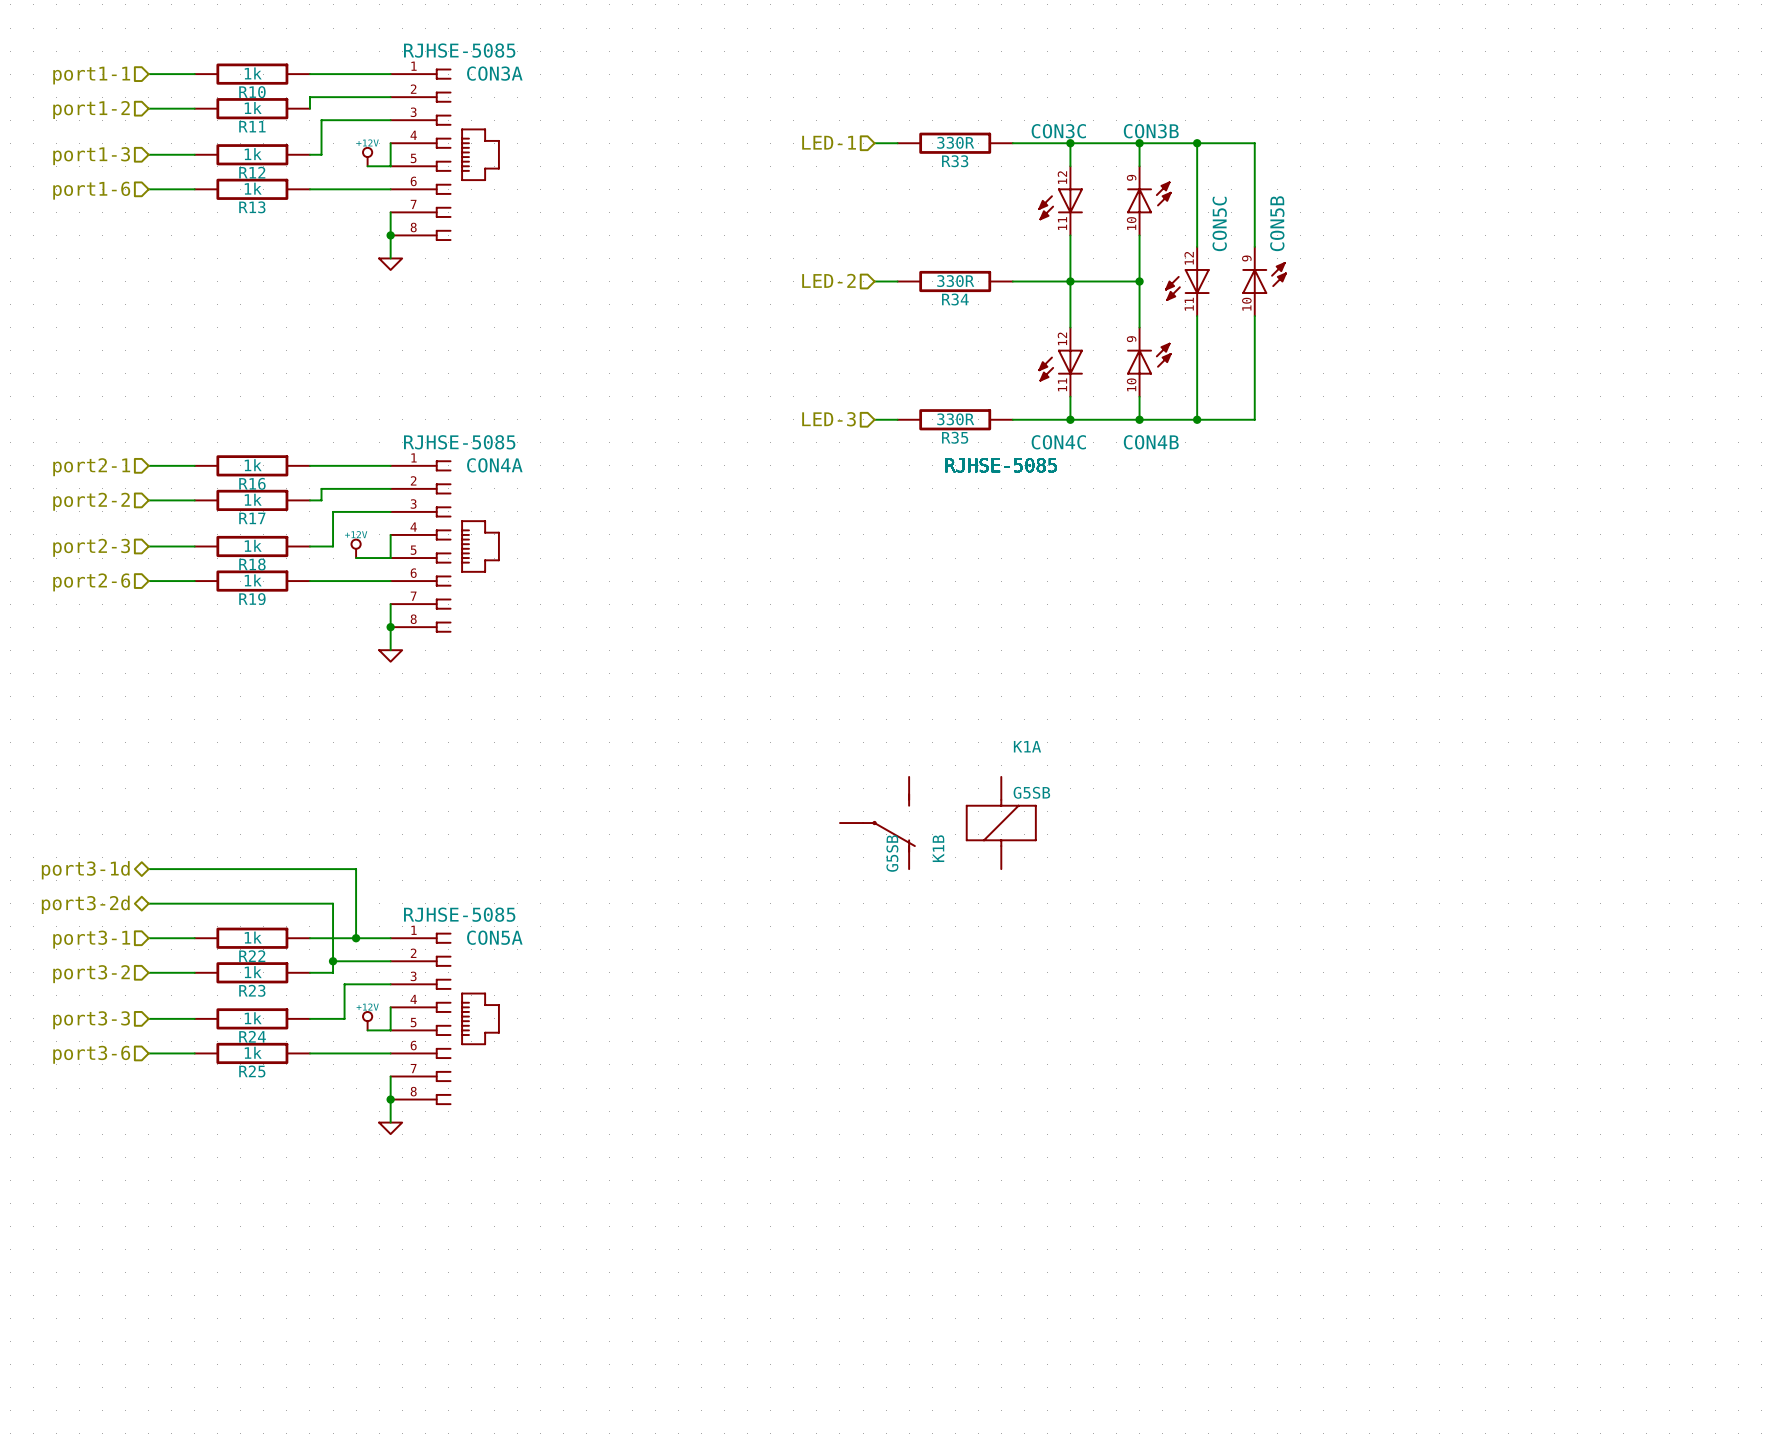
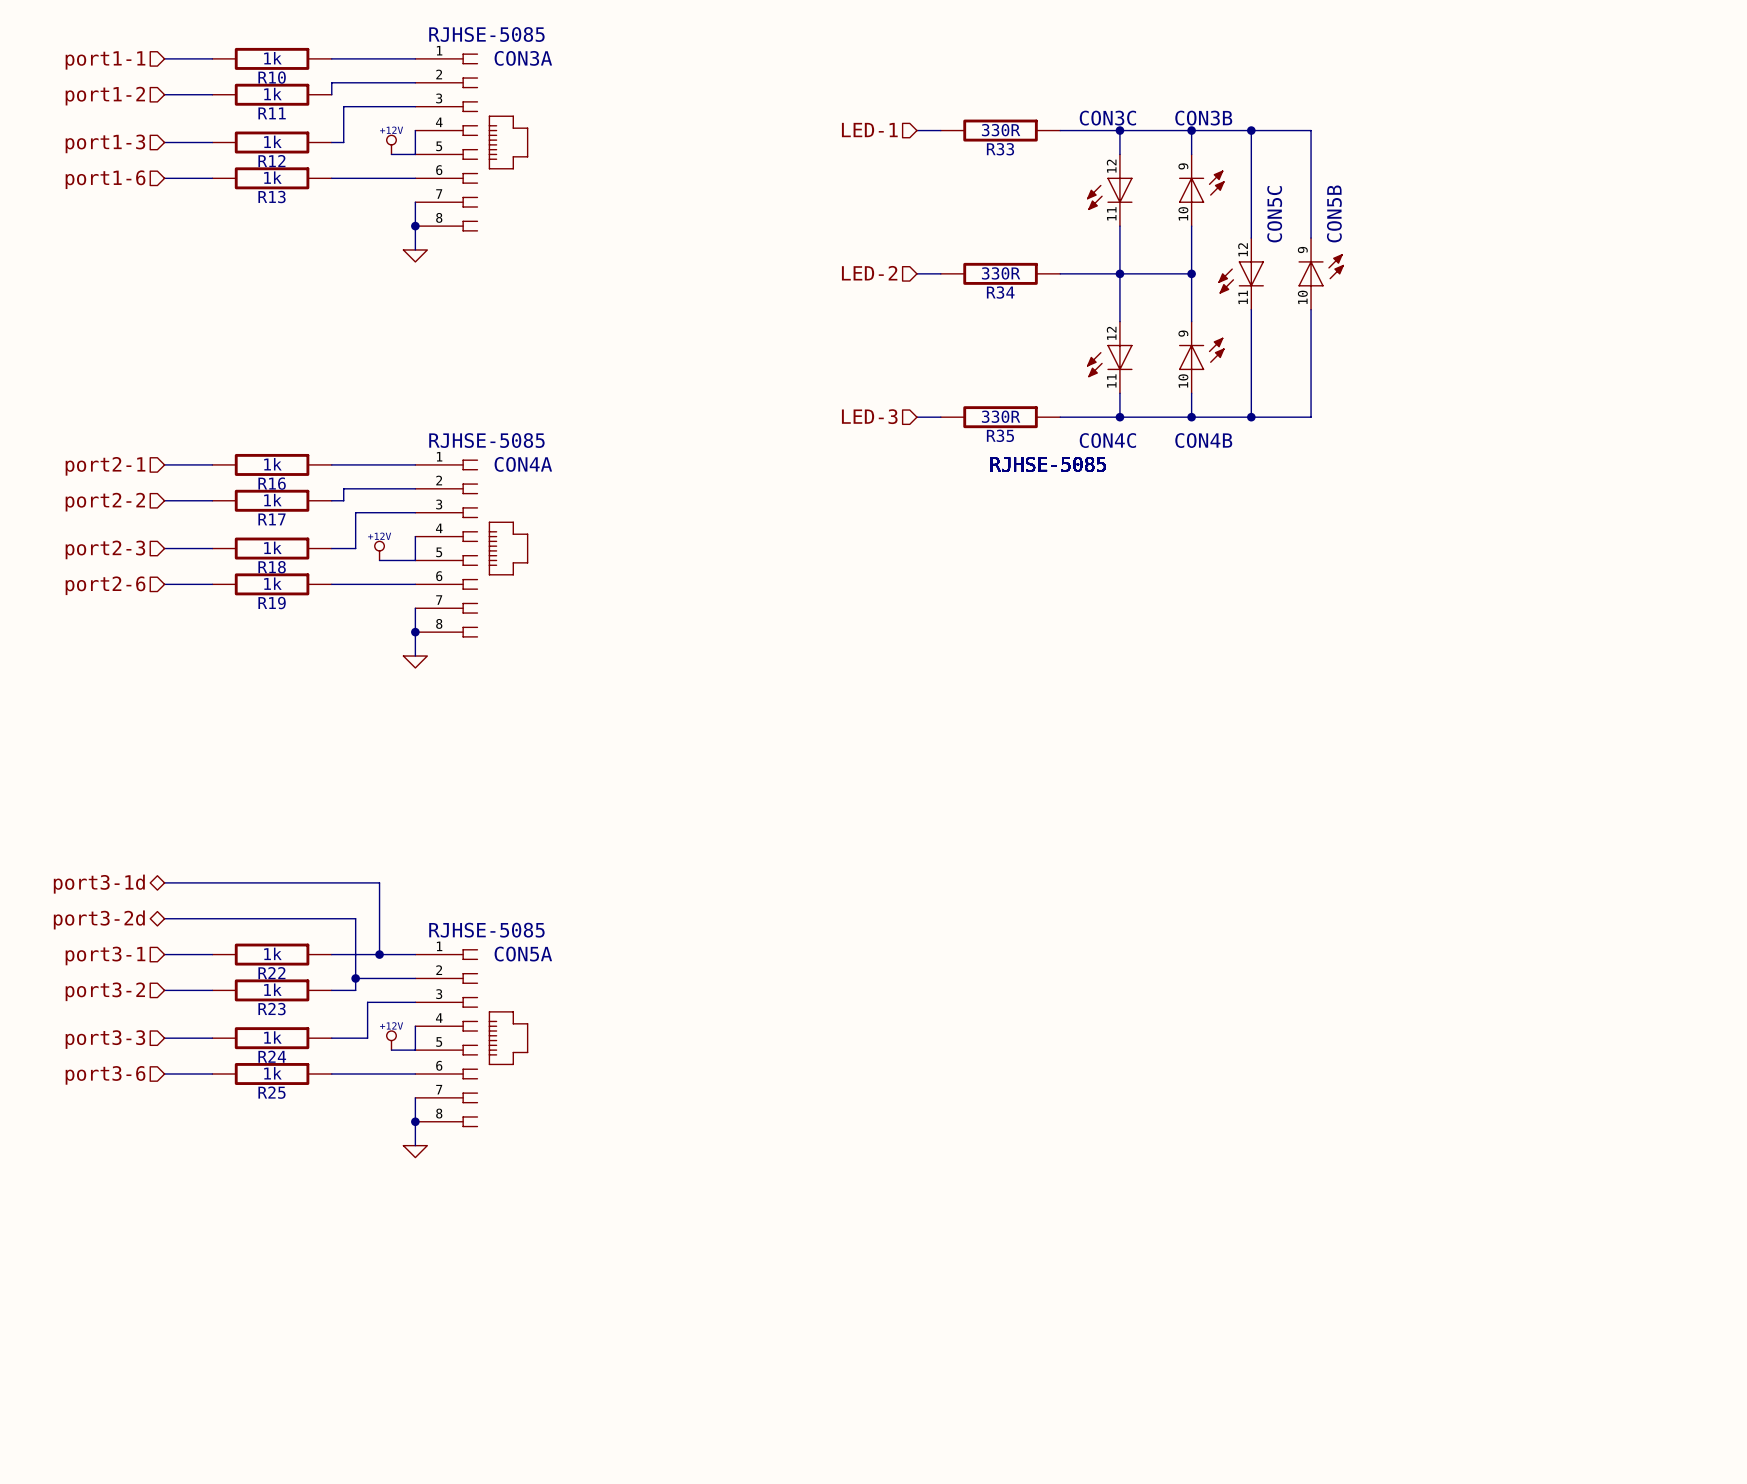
K1B: G5SB (877, 823) -> none
K1A: G5SB (1001, 823) -> none

